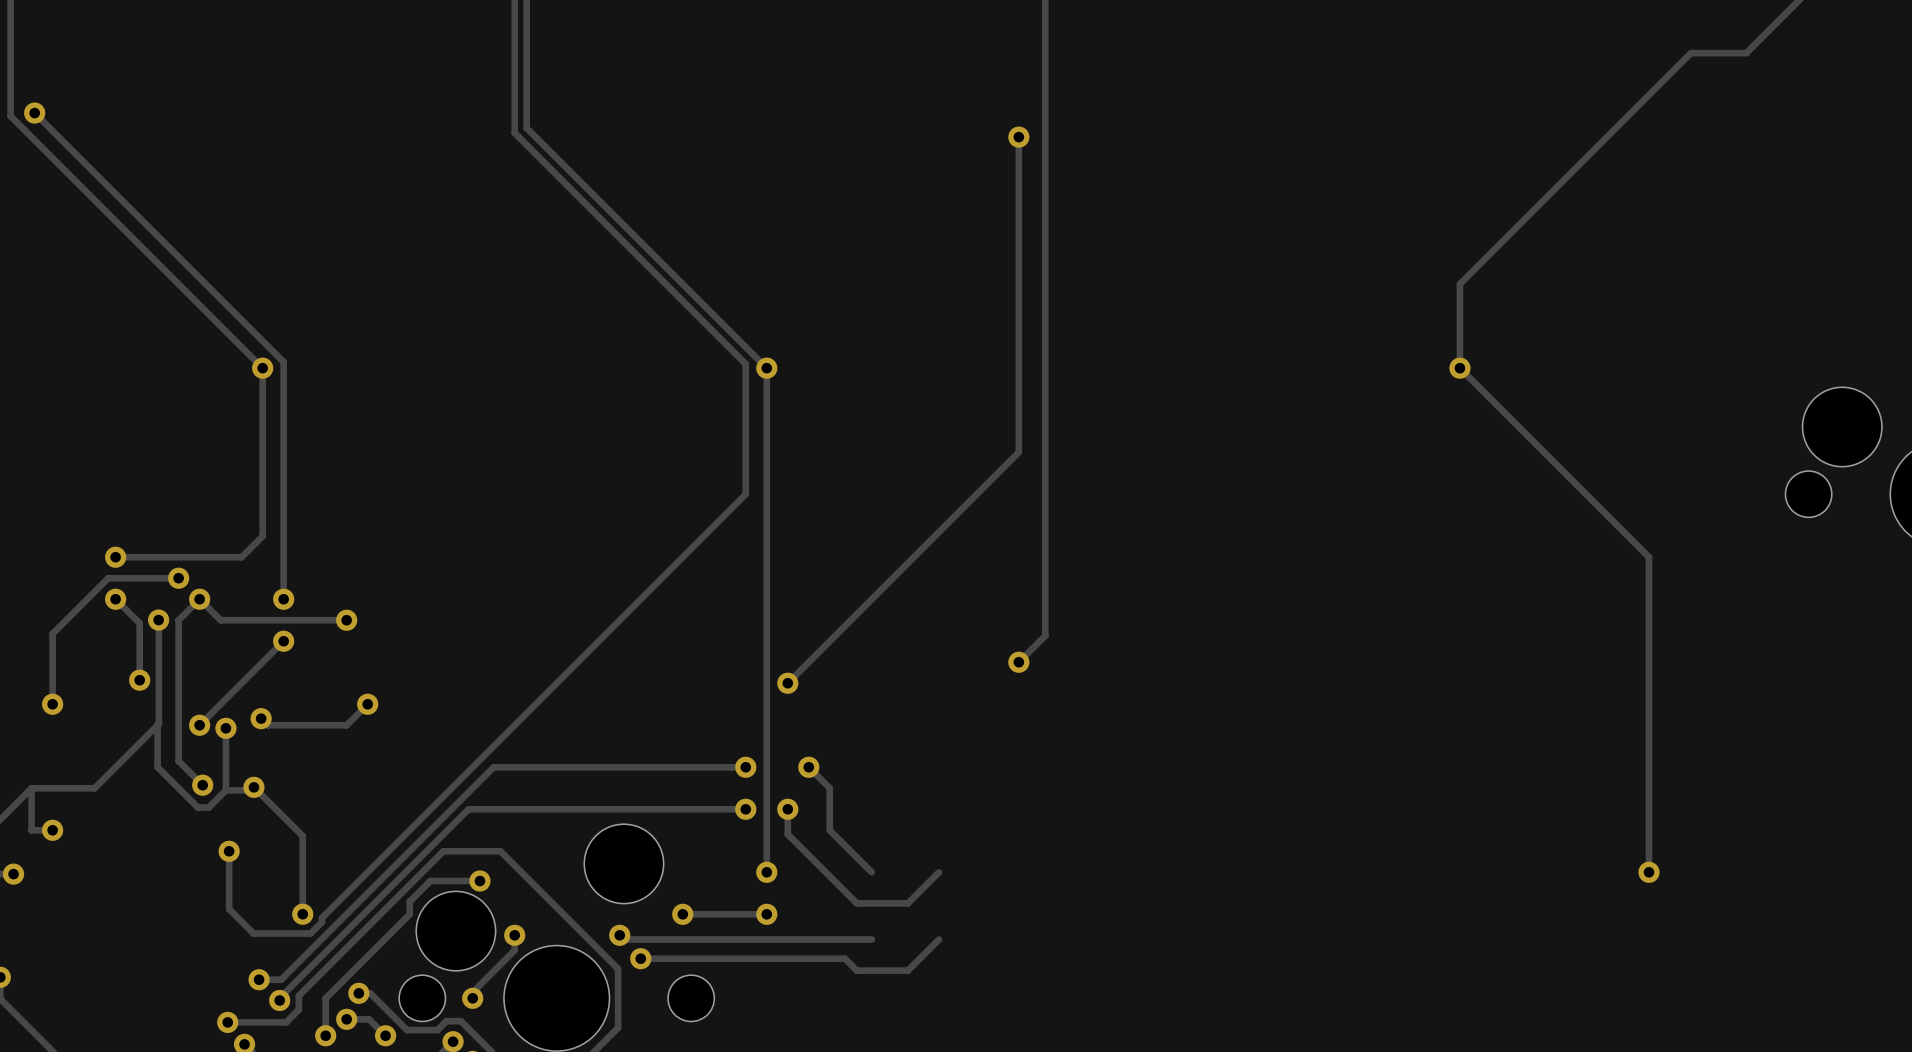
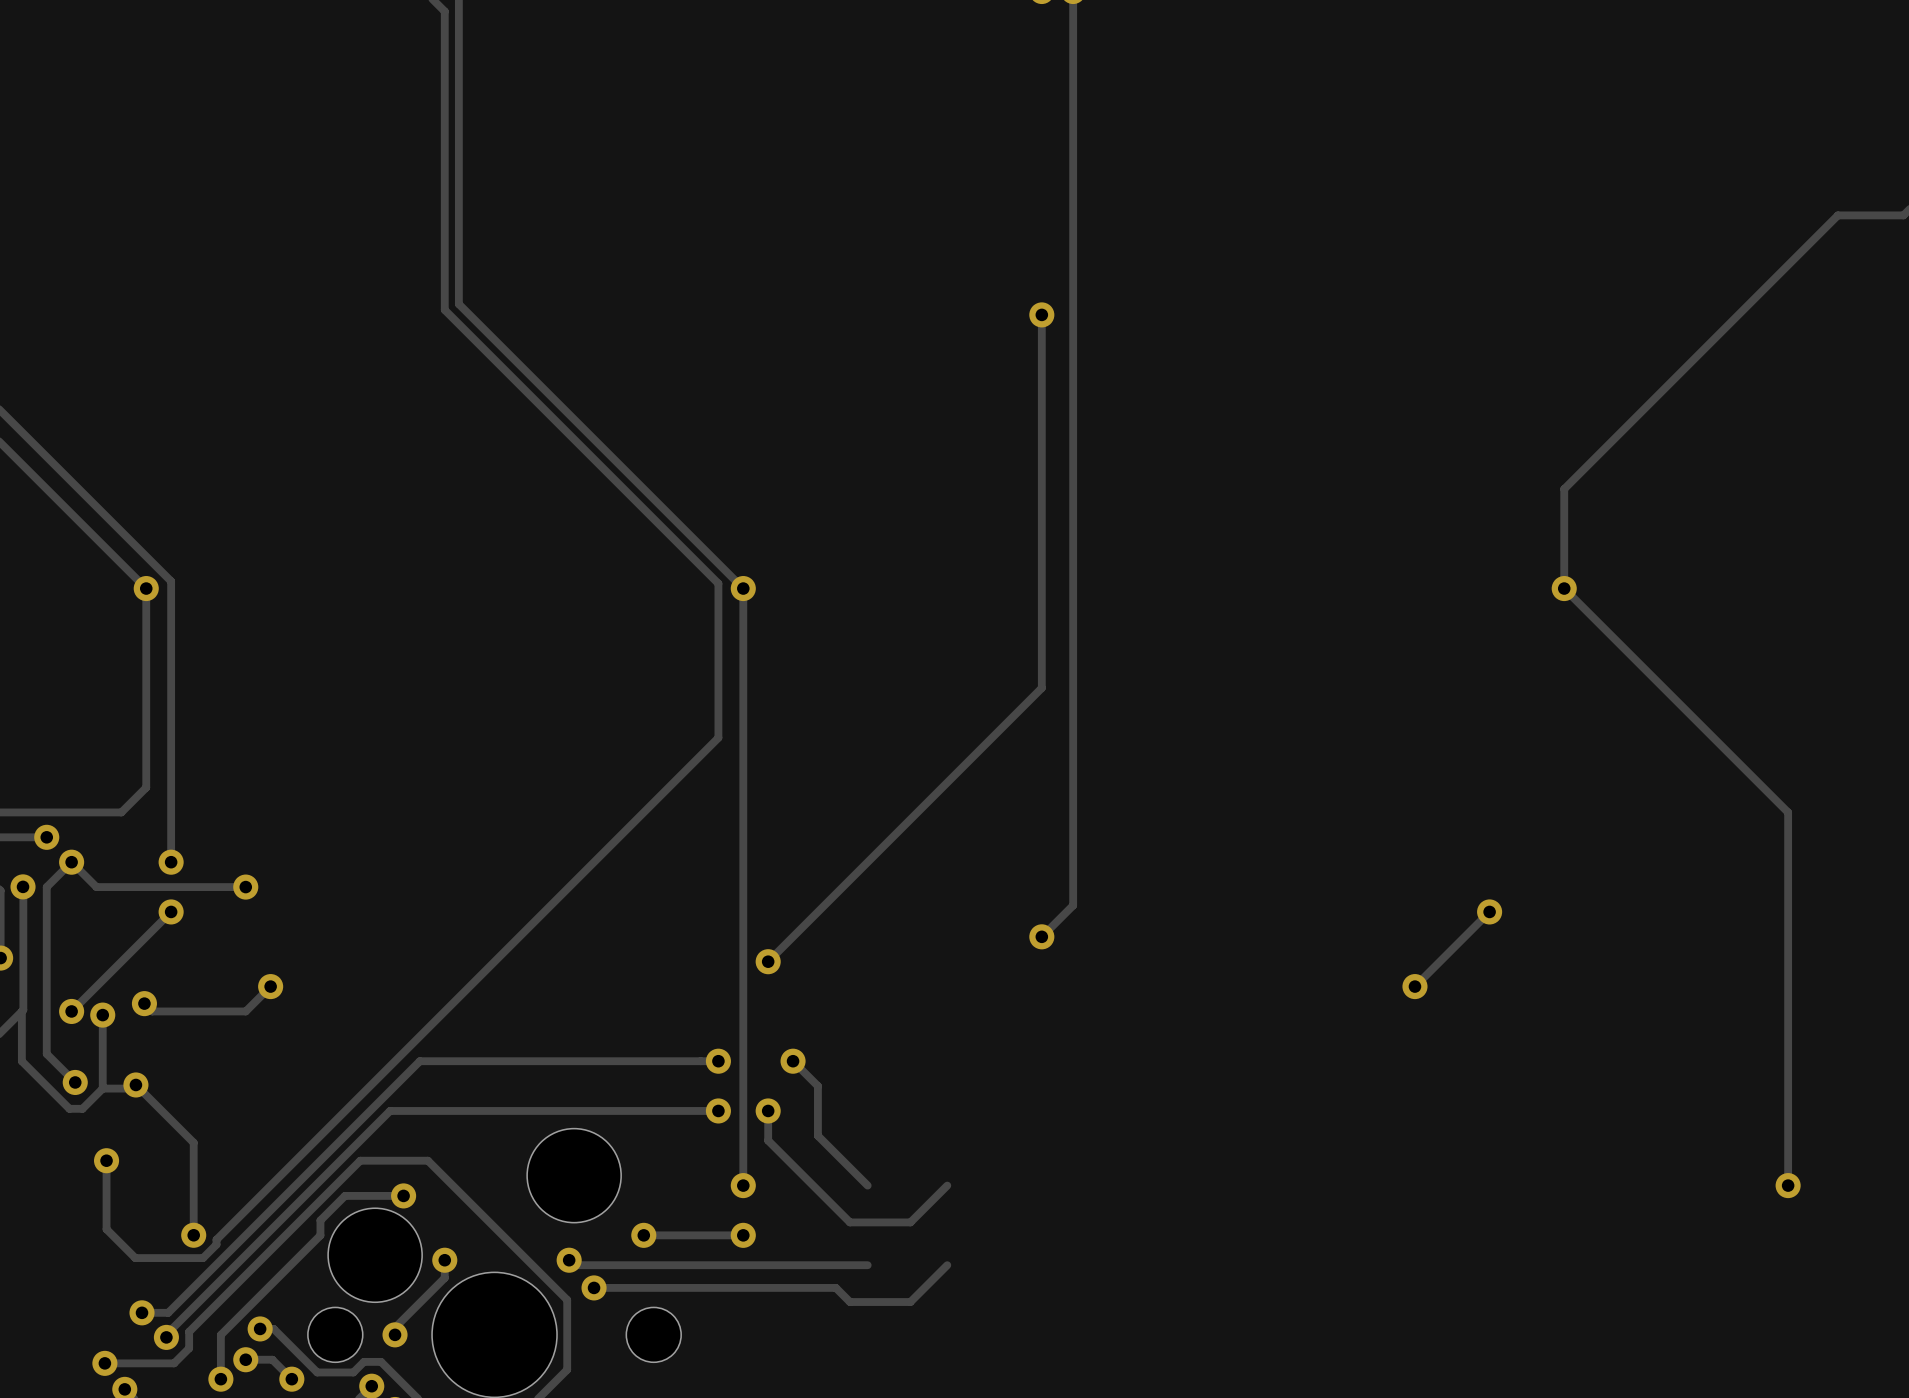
track: none -> (1489, 911) (1414, 986)
via: none -> (1489, 911)
via: none -> (1414, 986)

